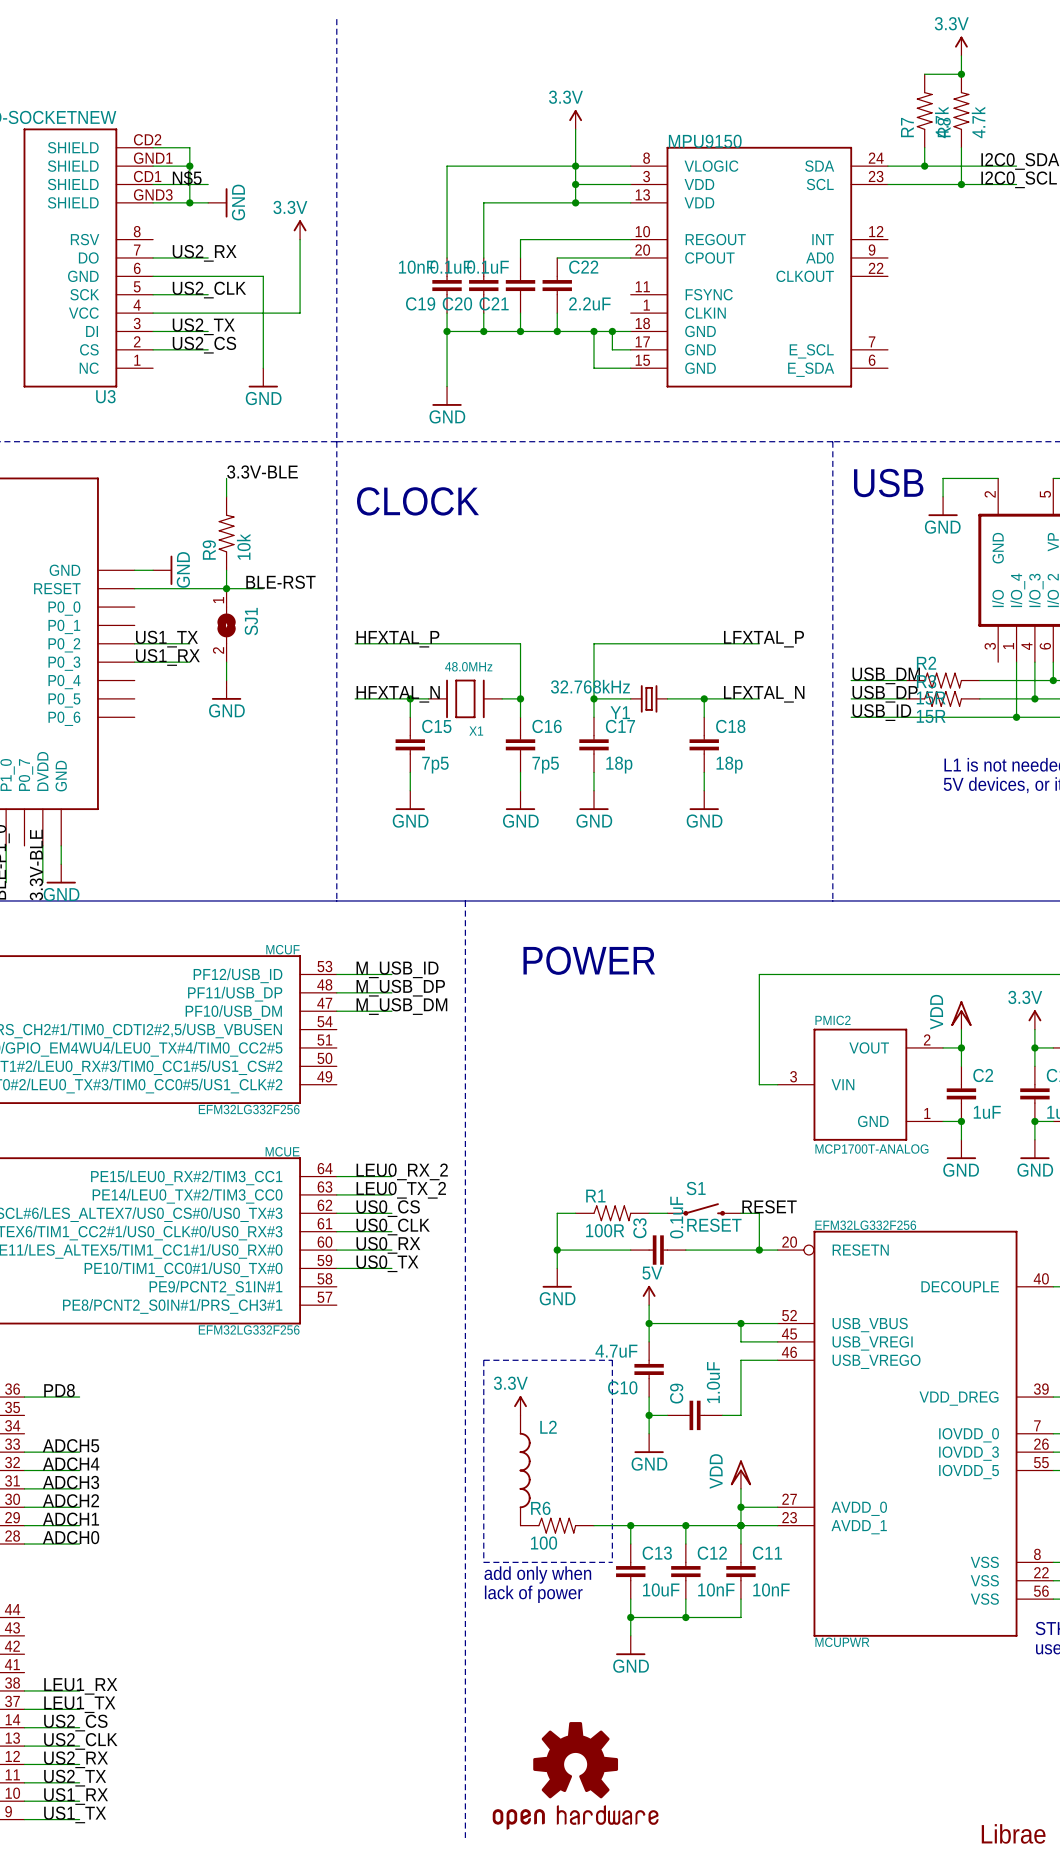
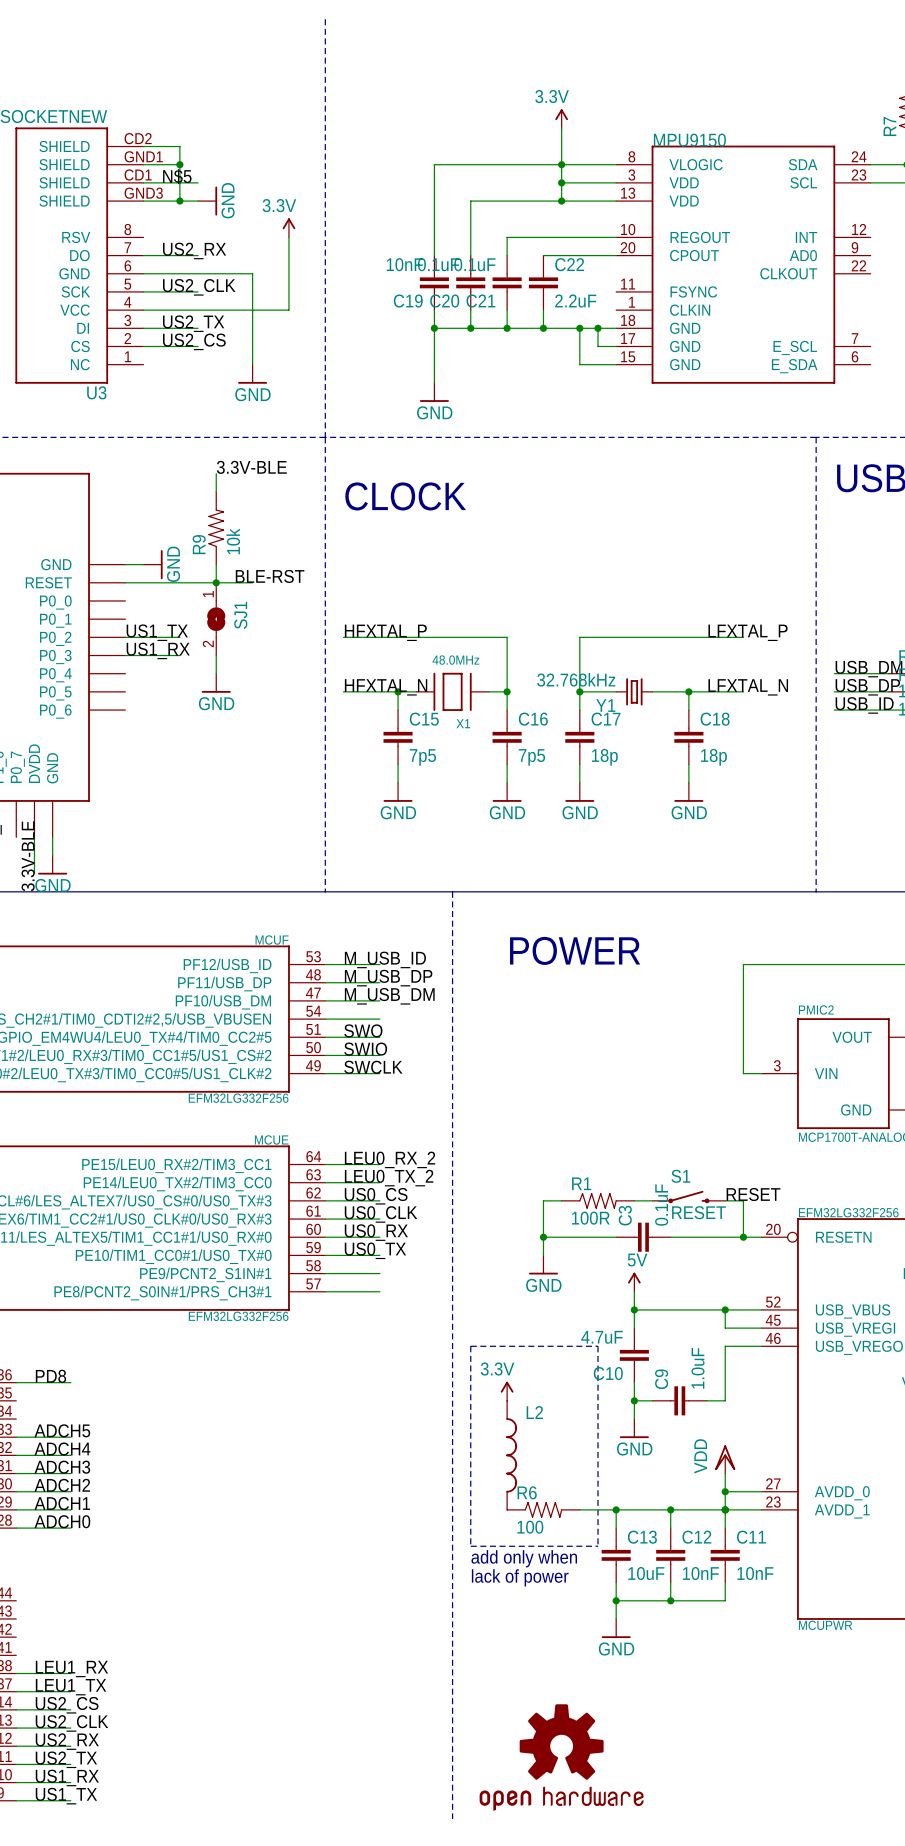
wire: none -> (325, 1019) (379, 1019)
label: none -> SWO (363, 1030)
wire: none -> (325, 1037) (379, 1037)
label: none -> SWIO (365, 1049)
wire: none -> (325, 1055) (379, 1055)
label: none -> SWCLK (373, 1067)
wire: none -> (325, 1073) (379, 1073)
wire: none -> (325, 1273) (379, 1273)
wire: none -> (325, 1291) (379, 1291)

